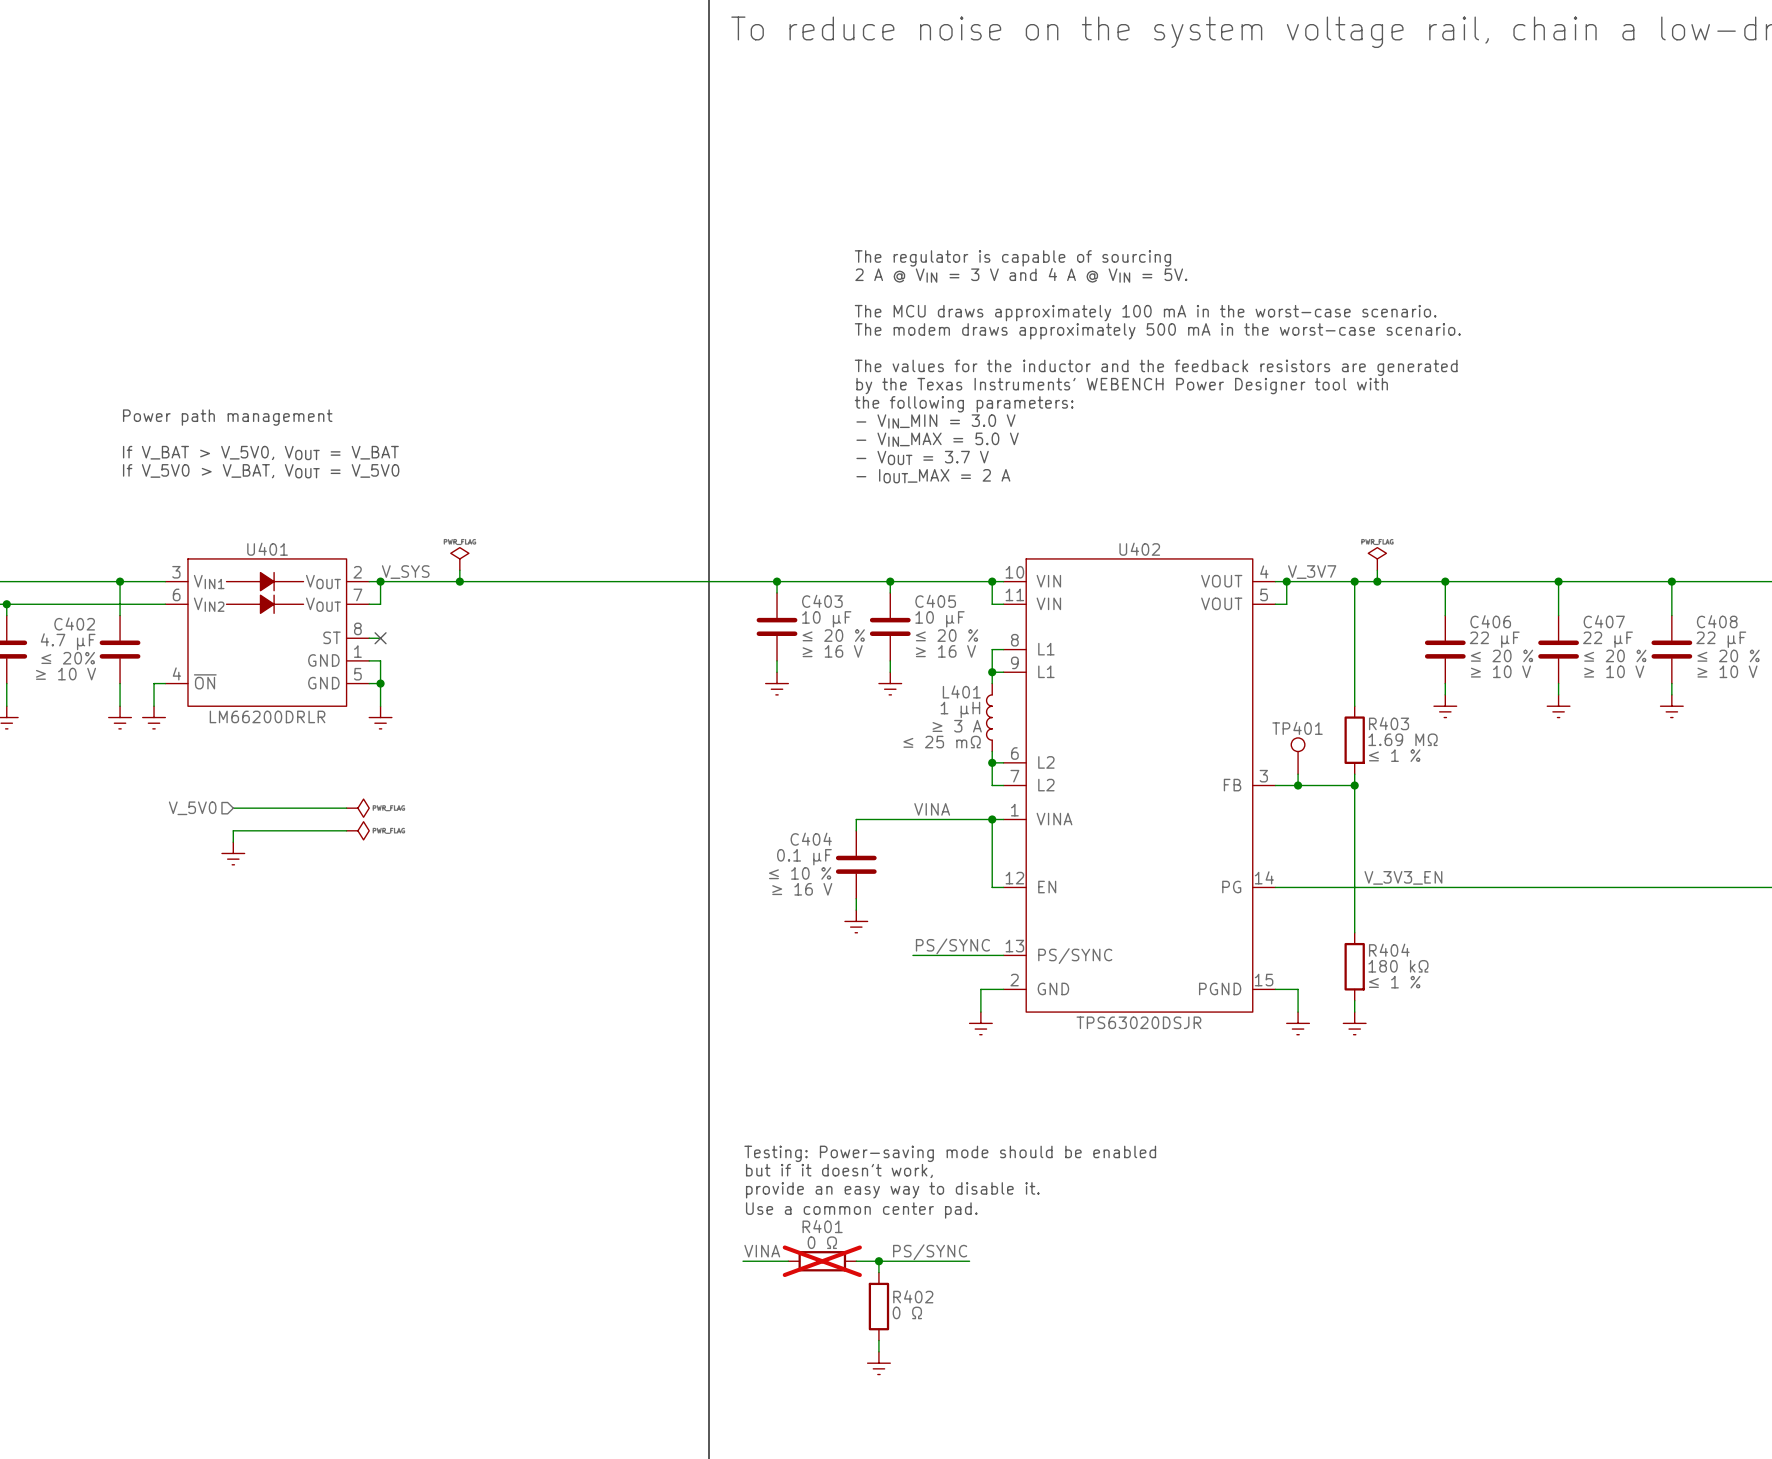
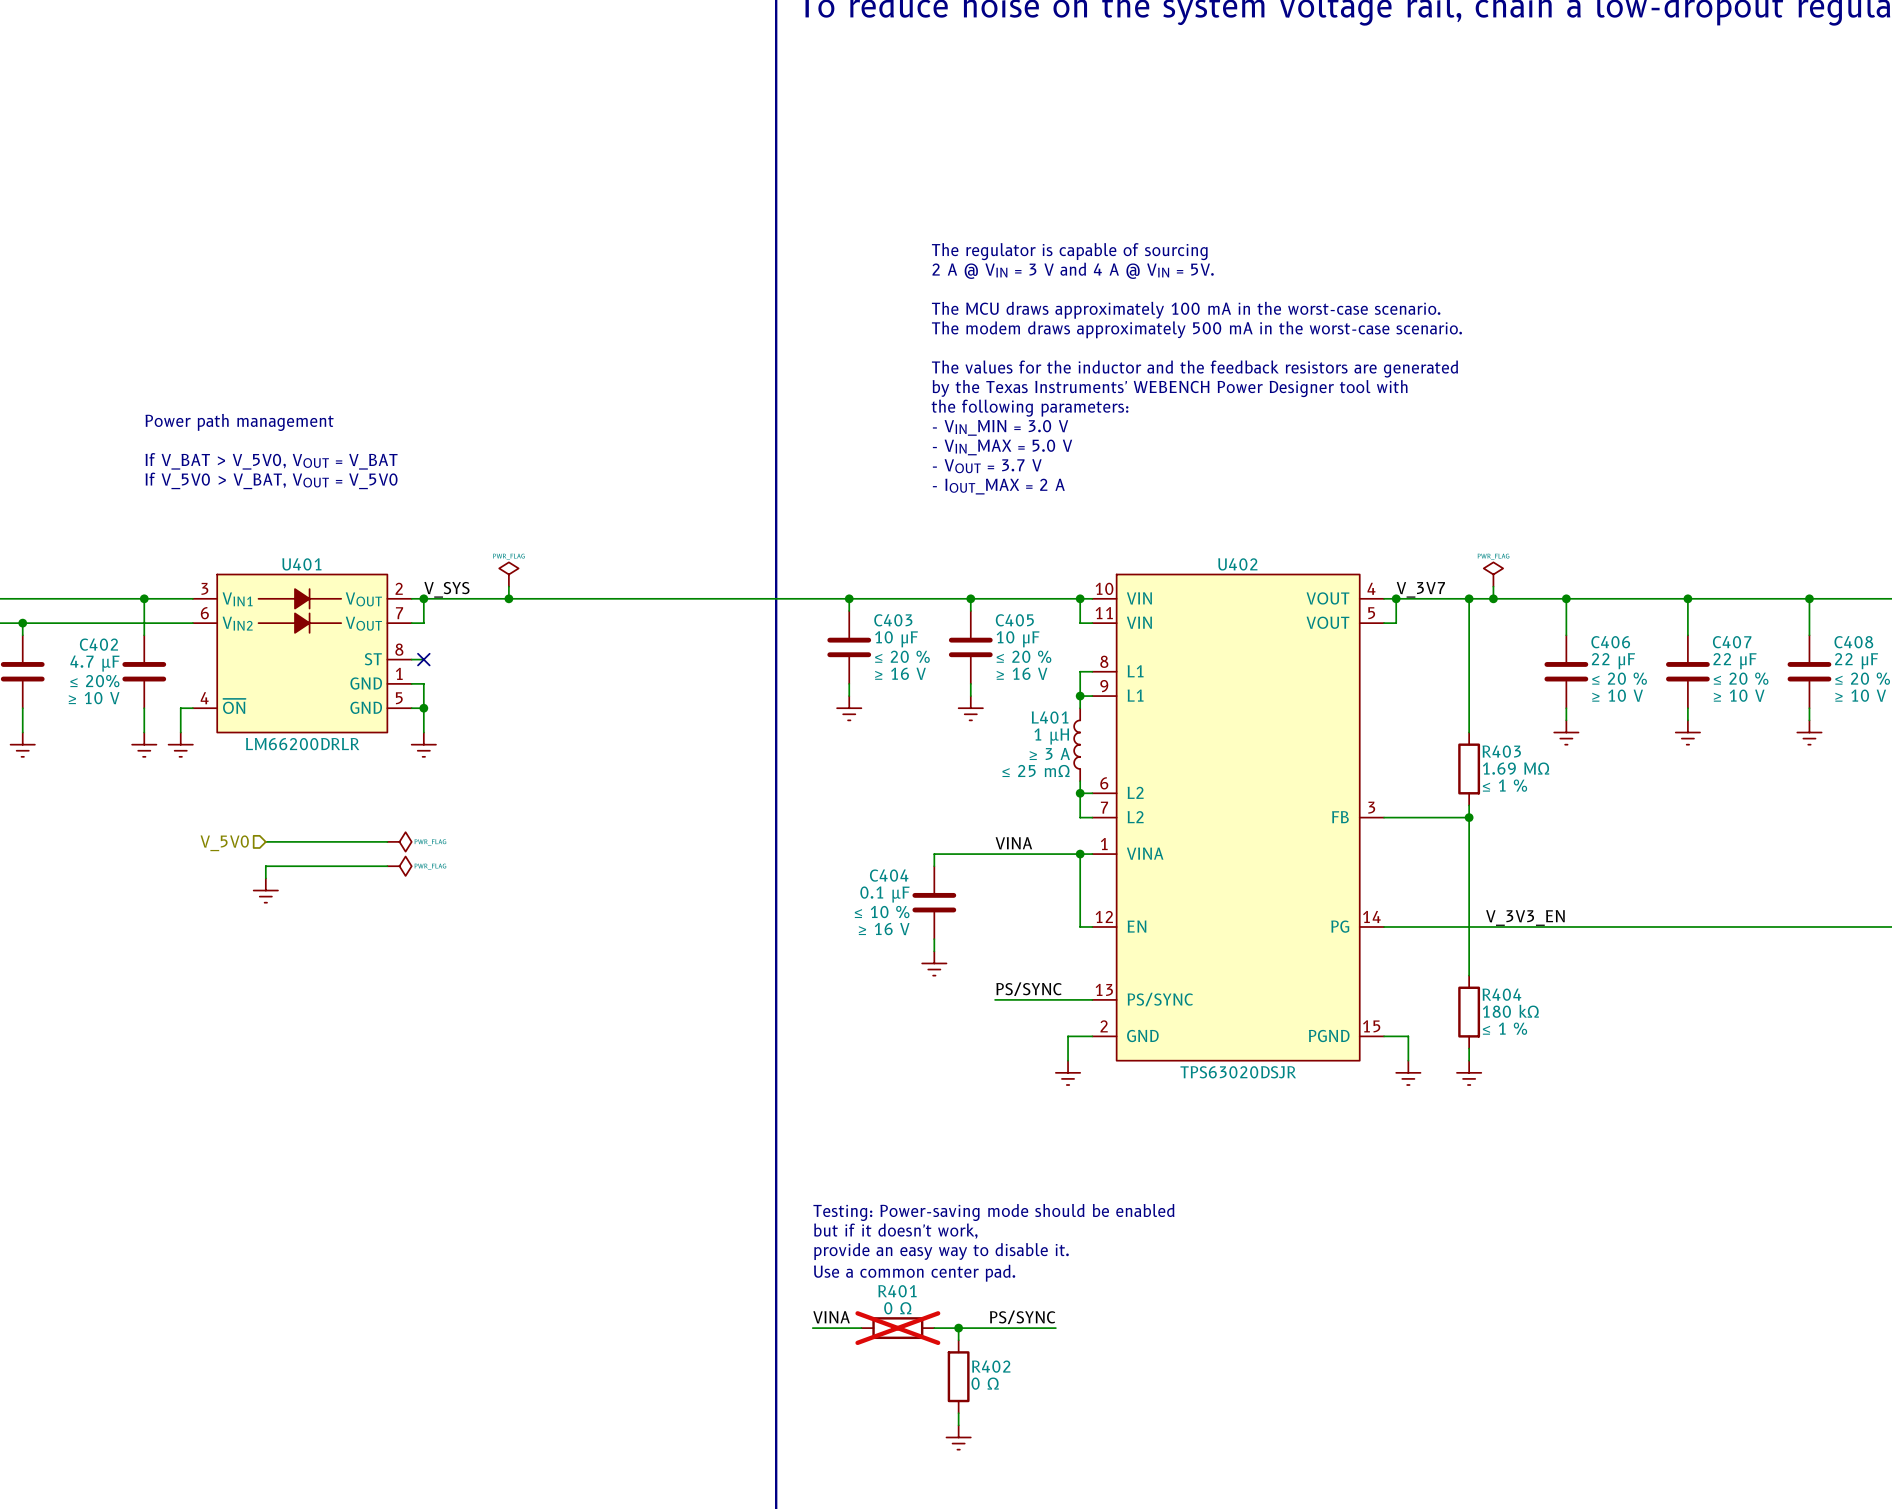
TP401: (1298, 756) -> none
wire: (1298, 774) (1298, 785) -> none
junction: (1298, 785) -> none

